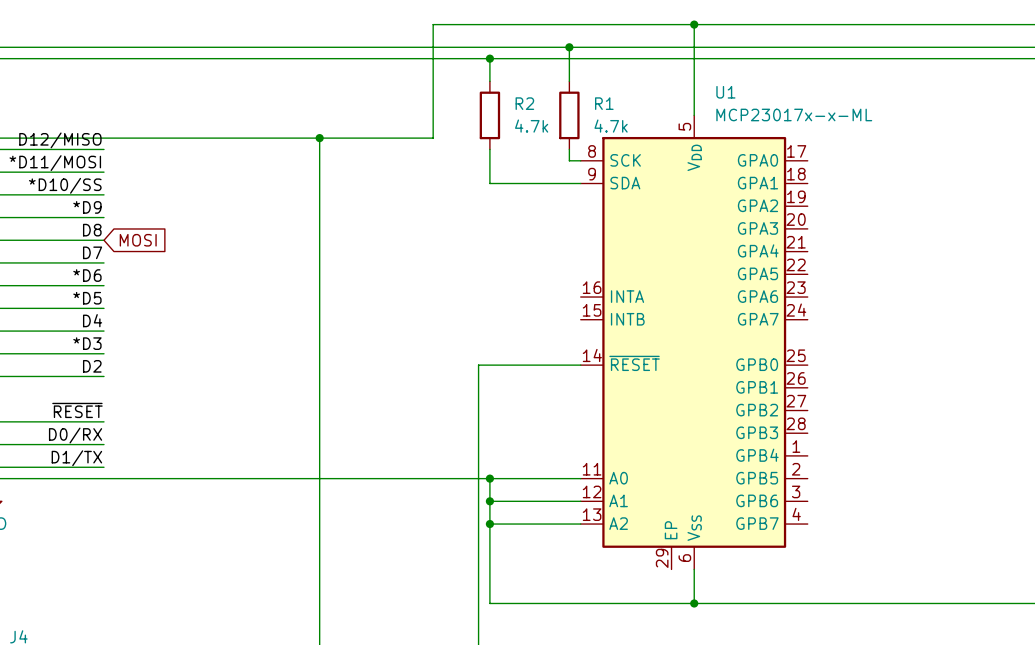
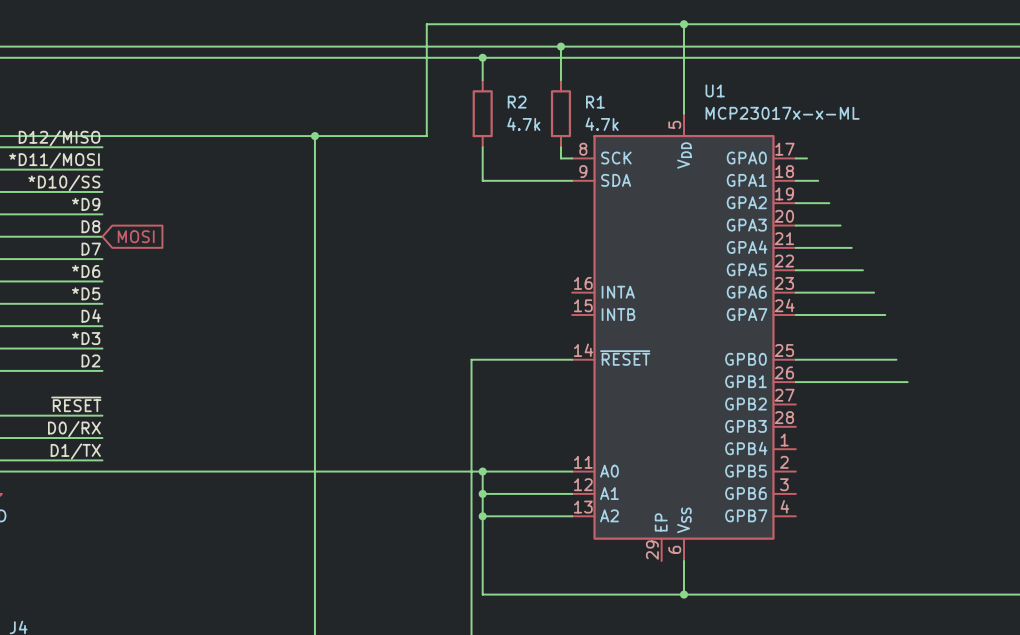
wire: none -> (795, 158) (807, 158)
wire: none -> (795, 180) (818, 180)
wire: none -> (795, 203) (829, 203)
wire: none -> (795, 225) (840, 225)
wire: none -> (795, 247) (851, 247)
wire: none -> (795, 270) (862, 270)
wire: none -> (795, 292) (874, 292)
wire: none -> (795, 315) (885, 315)
wire: none -> (795, 359) (896, 359)
wire: none -> (795, 382) (907, 382)

